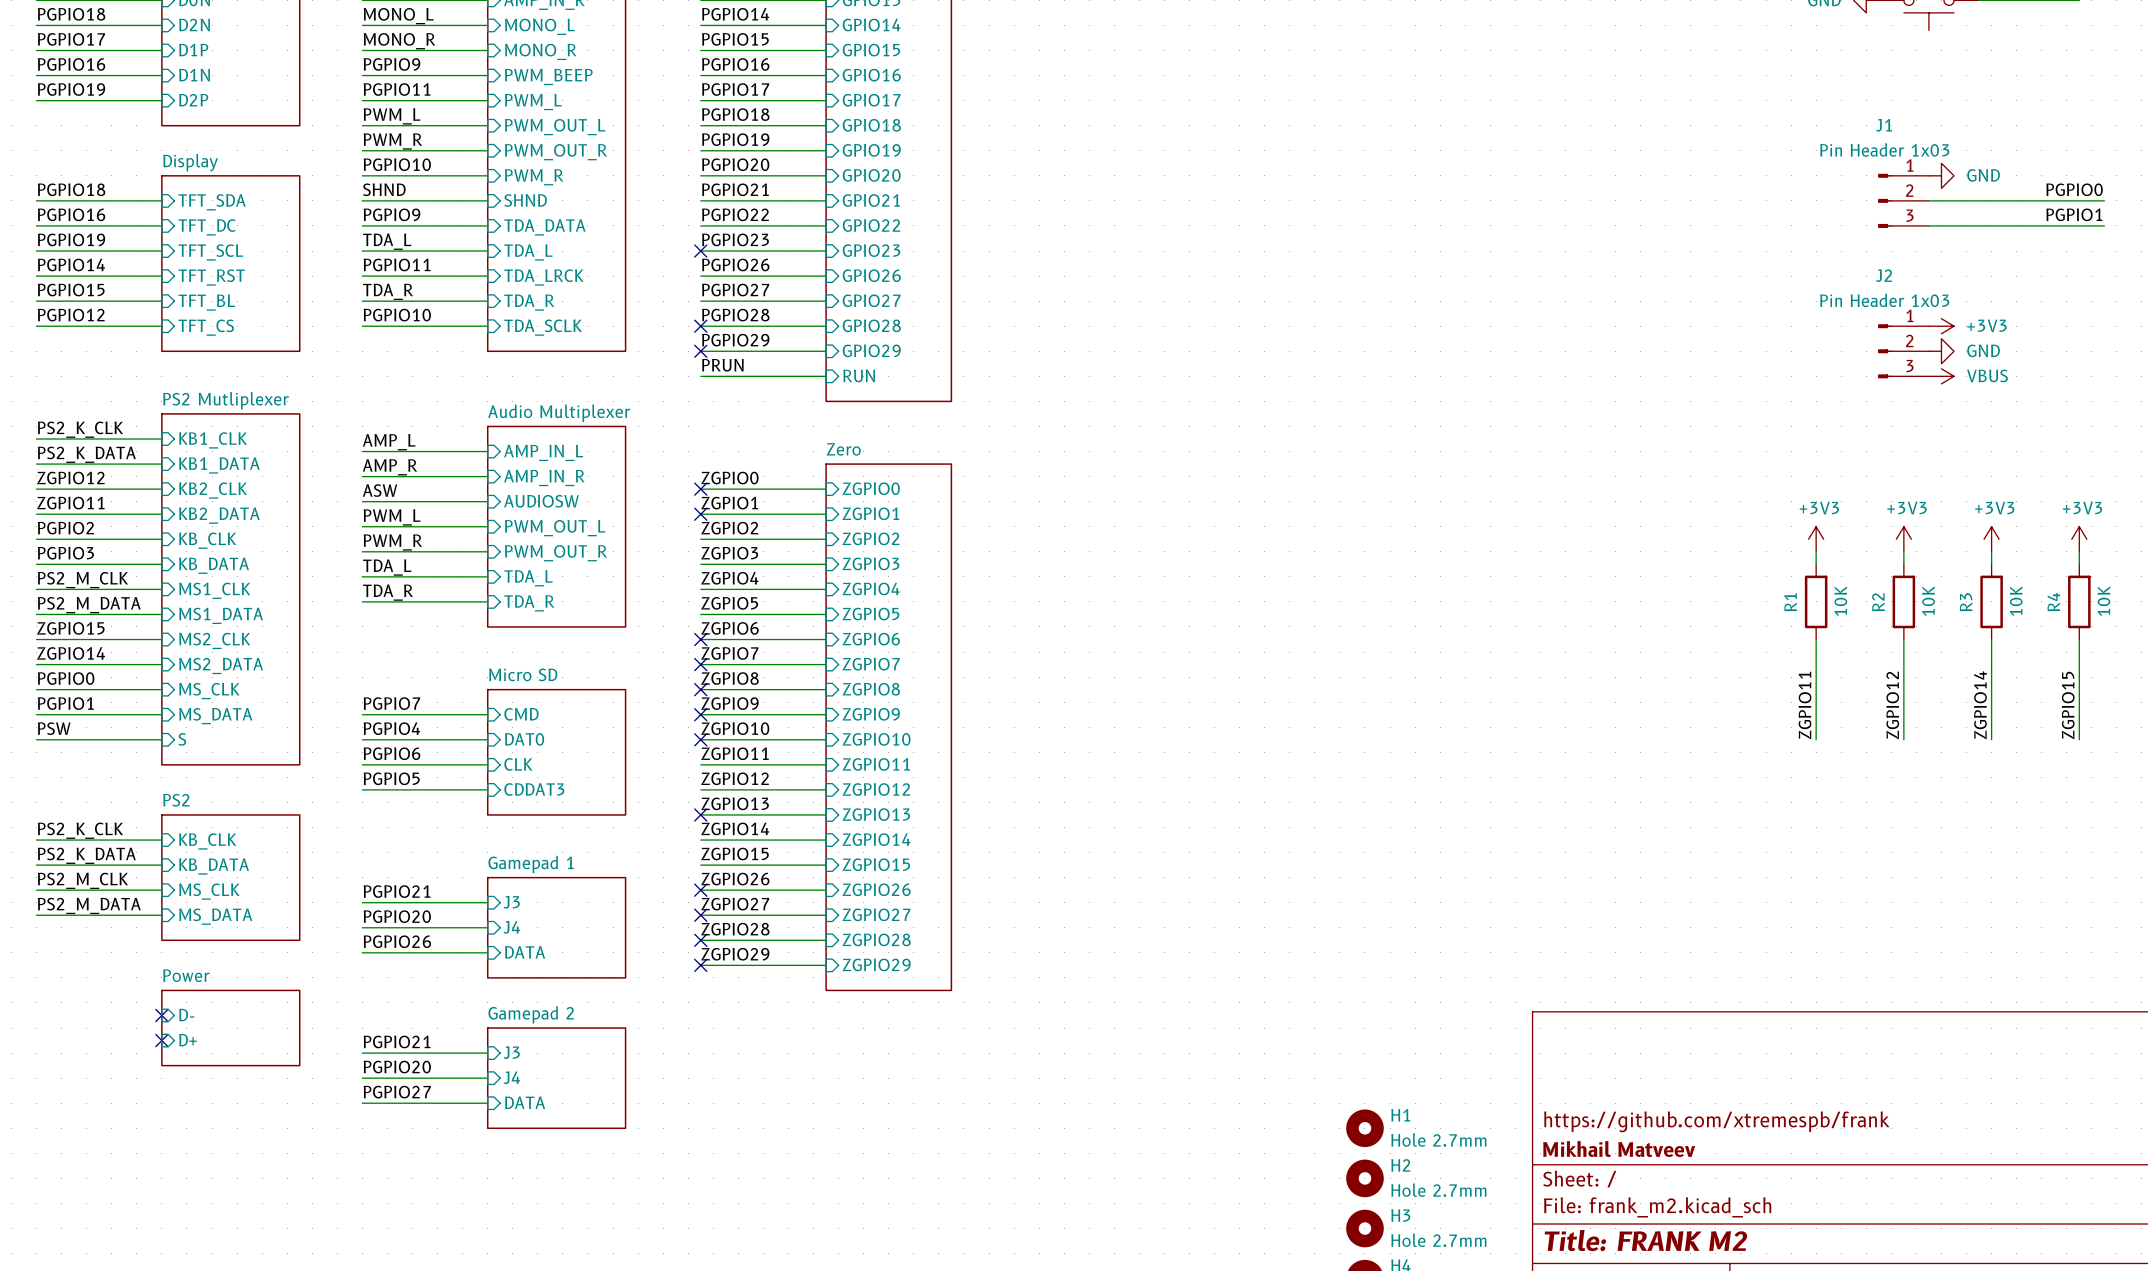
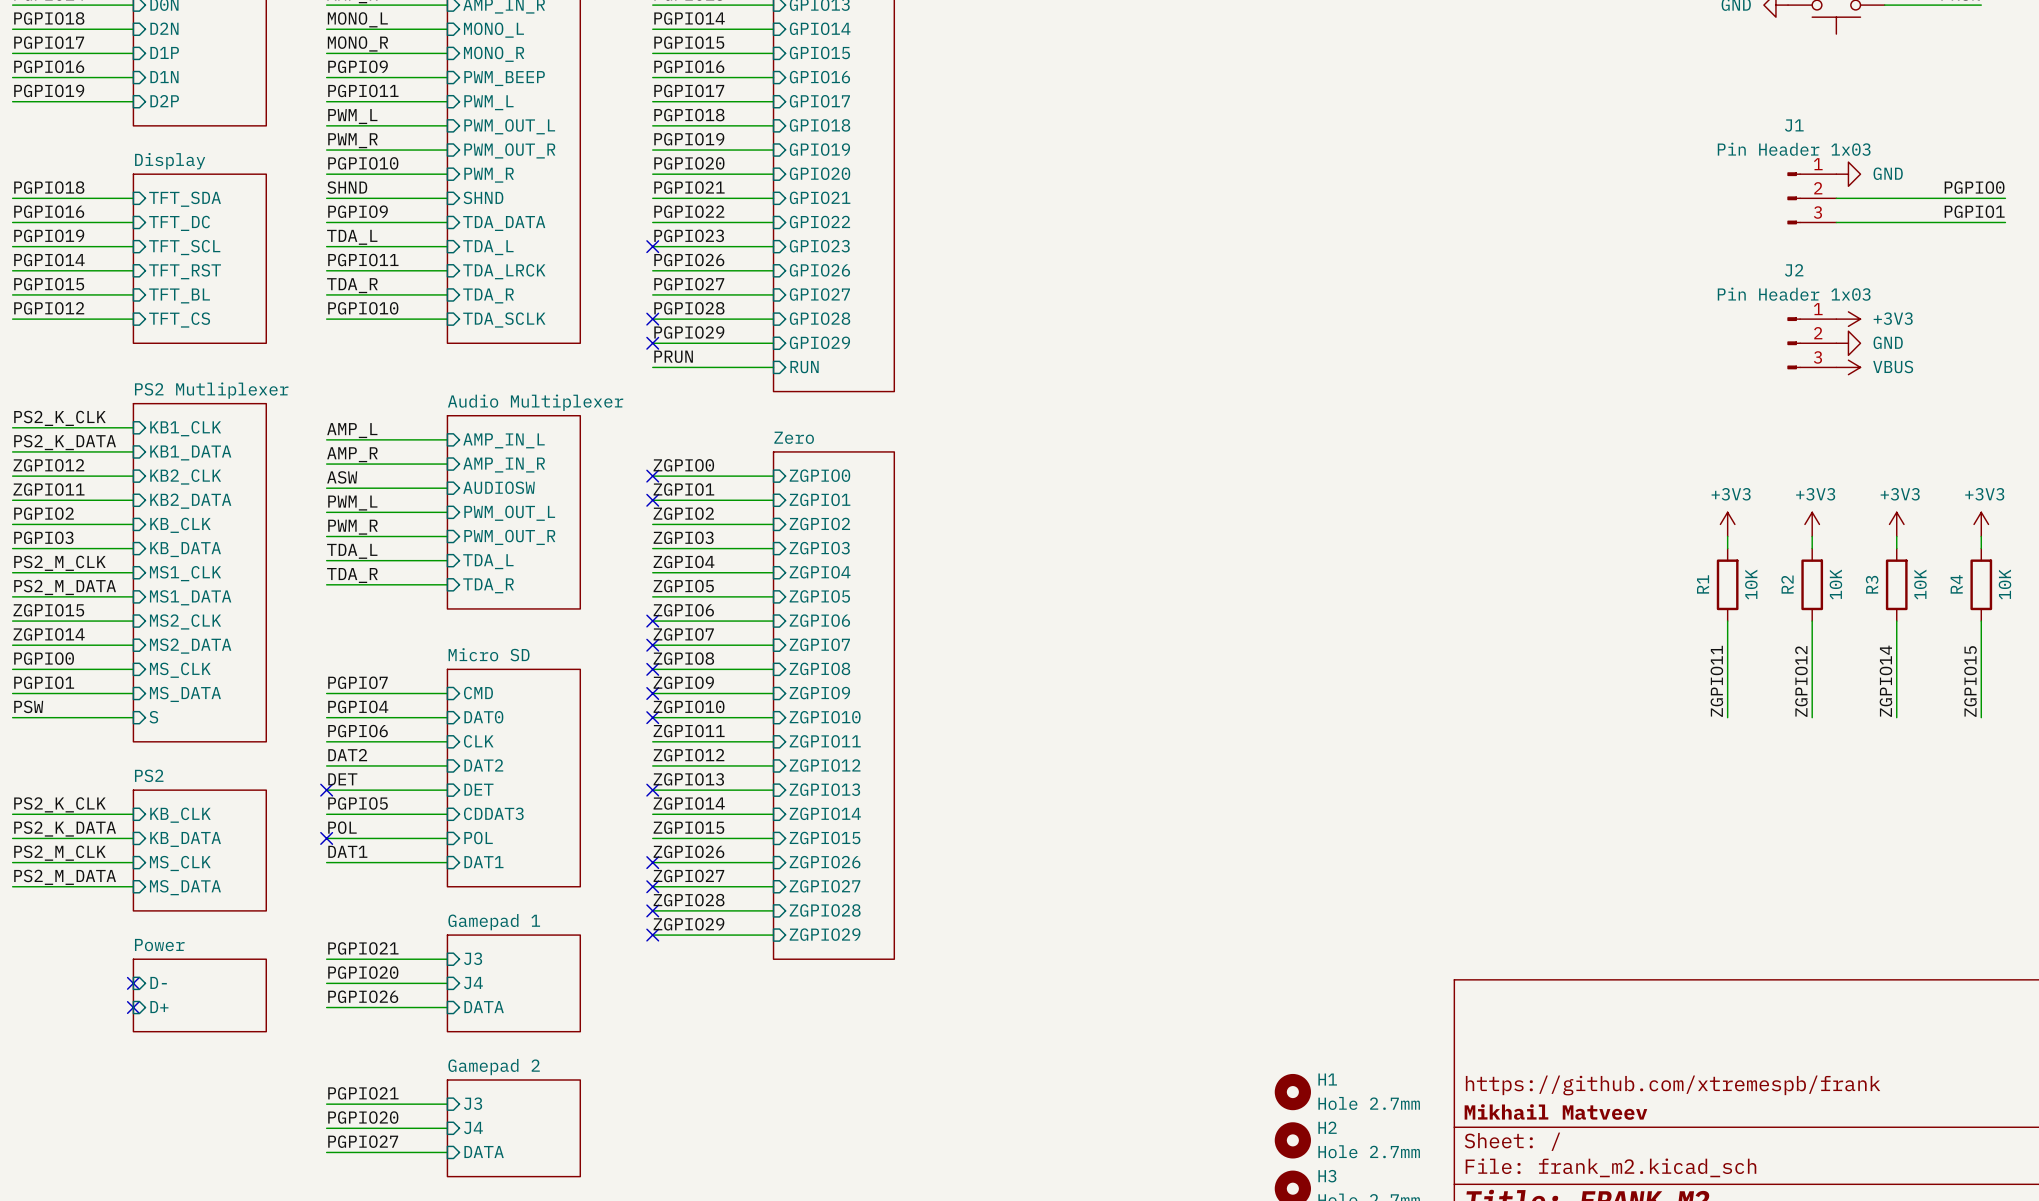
sheet Micro SD: (556, 752) -> none
label: PGPIO5 (391, 778) -> DAT2 (347, 755)
sheet pin: CDDAT3 (534, 789) -> DAT2 (483, 765)
sheet Micro SD: none -> (513, 778)
label: none -> DET (342, 779)
wire: none -> (326, 790) (447, 790)
no-connect mark: none -> (326, 790)
sheet pin: none -> DET (478, 789)
label: none -> PGPIO5 (358, 803)
sheet pin: none -> CDDAT3 (493, 813)
label: none -> POL (342, 827)
sheet pin: none -> POL (478, 837)
no-connect mark: none -> (326, 838)
label: none -> DAT1 (347, 851)
sheet pin: none -> DAT1 (483, 862)
label: PGPIO21 (397, 891) -> none
wire: (362, 902) (487, 902) -> (326, 814) (447, 814)
sheet pin: J3 (511, 902) -> none
label: PGPIO20 (397, 916) -> none
wire: (362, 927) (487, 927) -> (326, 838) (447, 838)
sheet pin: J4 (511, 927) -> none
sheet Gamepad 1 position: (556, 927) -> (513, 983)
label position: PGPIO26 (397, 941) -> PGPIO26 (363, 996)
wire: (362, 952) (487, 952) -> (326, 862) (447, 862)
sheet pin: DATA (525, 952) -> none
label: none -> PGPIO21 (363, 948)
sheet pin: none -> J3 (473, 958)
label: none -> PGPIO20 (363, 972)
sheet pin: none -> J4 (473, 983)
sheet pin: none -> DATA (484, 1007)
label: PGPIO21 (397, 1041) -> none
sheet pin: J3 (511, 1052) -> none
wire: (362, 1053) (487, 1053) -> (326, 959) (447, 959)
label: PGPIO20 (397, 1067) -> none
sheet pin: J4 (511, 1077) -> none
wire: (362, 1078) (487, 1078) -> (326, 983) (447, 983)
sheet Gamepad 2 position: (556, 1078) -> (513, 1128)
label position: PGPIO27 (397, 1092) -> PGPIO27 (363, 1141)
sheet pin: DATA (525, 1102) -> none
wire: (362, 1103) (487, 1103) -> (326, 1007) (447, 1007)
label: none -> PGPIO21 (363, 1093)
wire: none -> (326, 1104) (447, 1104)
sheet pin: none -> J3 (473, 1103)
label: none -> PGPIO20 (363, 1117)
wire: none -> (326, 1128) (447, 1128)
sheet pin: none -> J4 (473, 1127)
wire: none -> (326, 1152) (447, 1152)
sheet pin: none -> DATA (484, 1152)

